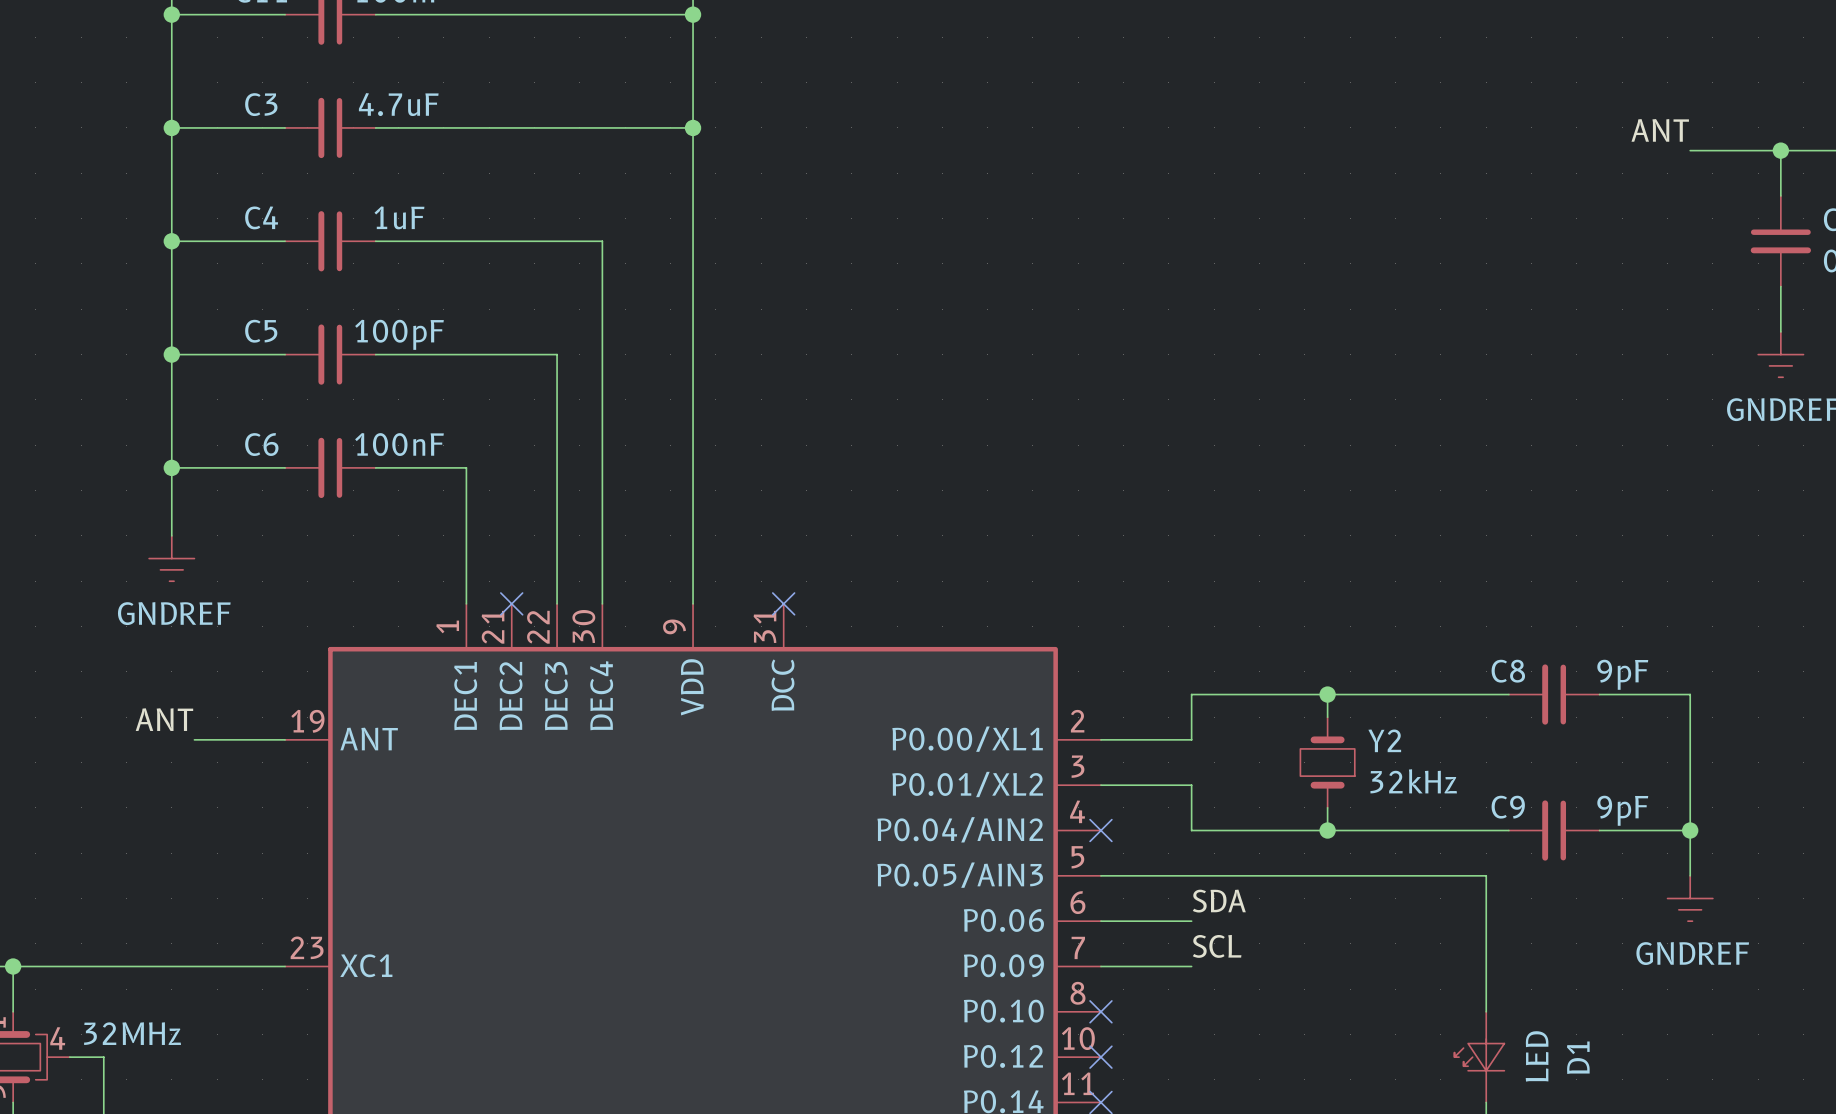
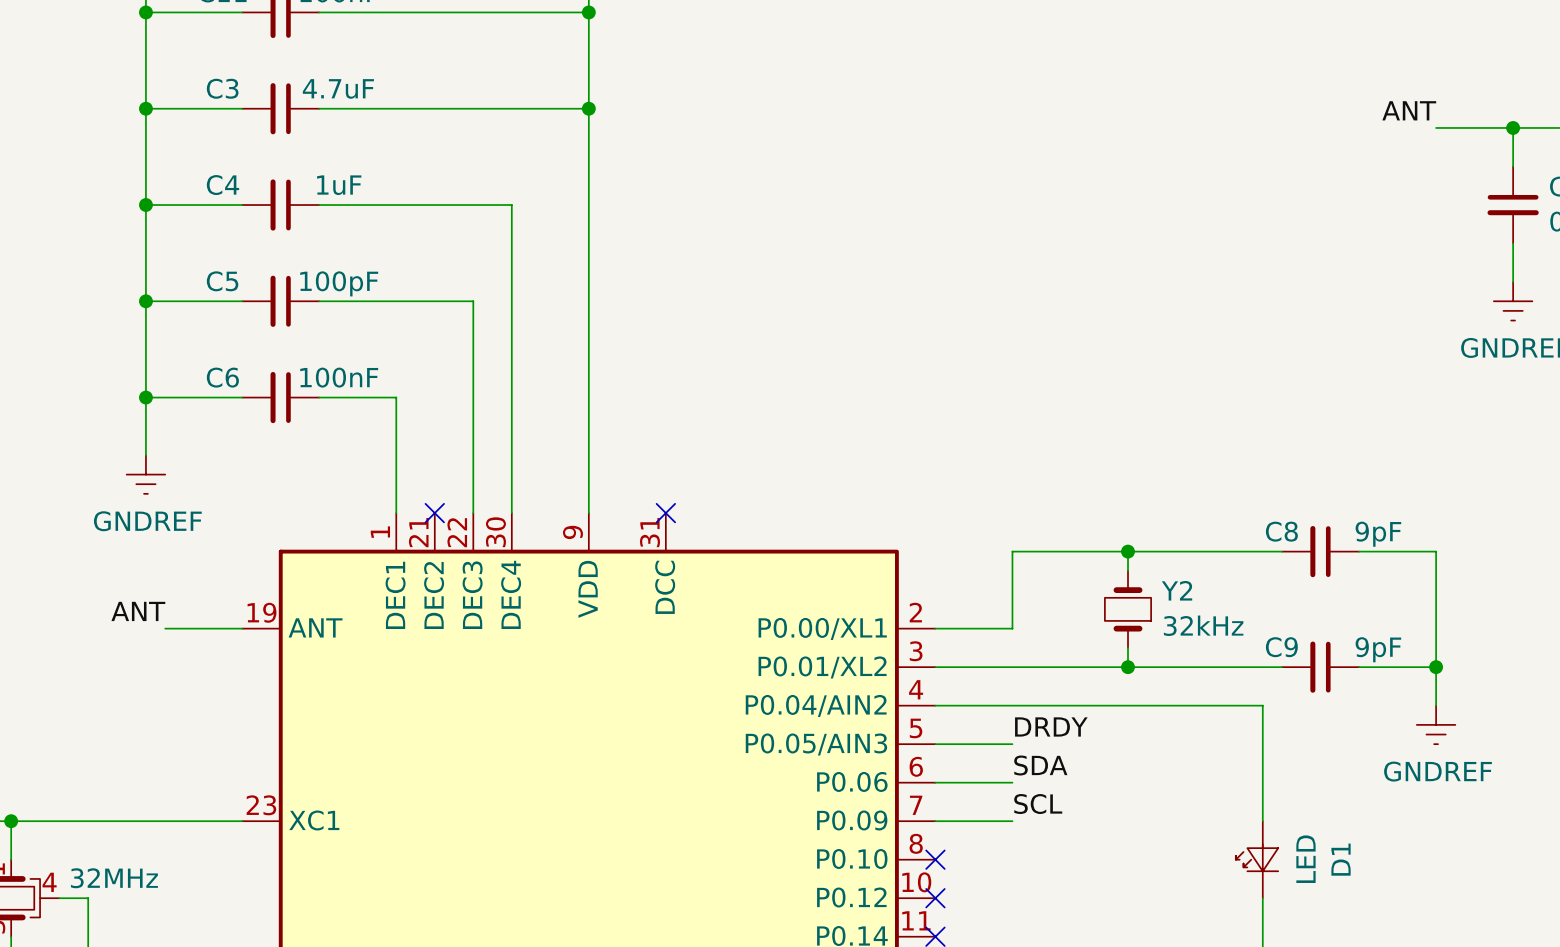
junction: none -> (1128, 551)
wire: (1191, 694) (1508, 694) -> (1012, 590) (1012, 551) (1282, 551)
wire: (1327, 694) (1327, 717) -> (1128, 551) (1128, 570)
junction: (1327, 694) -> none
C8 position: (1554, 694) -> (1320, 551)
wire: (1599, 694) (1690, 694) -> (1359, 551) (1436, 551) (1436, 590)
Y2 position: (1327, 762) -> (1128, 609)
wire: (1191, 785) (1191, 830) -> (935, 705) (1012, 705)
wire: none -> (1012, 667) (1282, 667)
junction: none -> (1128, 667)
wire: none -> (1359, 667) (1436, 667)
wire: (1327, 807) (1327, 830) -> (1128, 647) (1128, 667)
no-connect mark: (1100, 830) -> none
junction: (1327, 830) -> none
wire: (1486, 830) (1508, 830) -> (1262, 705) (1262, 744)
C9 position: (1554, 830) -> (1320, 667)
wire: (1599, 830) (1690, 830) (1690, 875) -> none
junction position: (1690, 830) -> (1436, 667)
label: none -> DRDY (1051, 726)
wire: (1191, 875) (1486, 875) -> none
power symbol position: GNDREF (1690, 898) -> GNDREF (1436, 724)
D1 position: (1479, 1057) -> (1257, 859)

